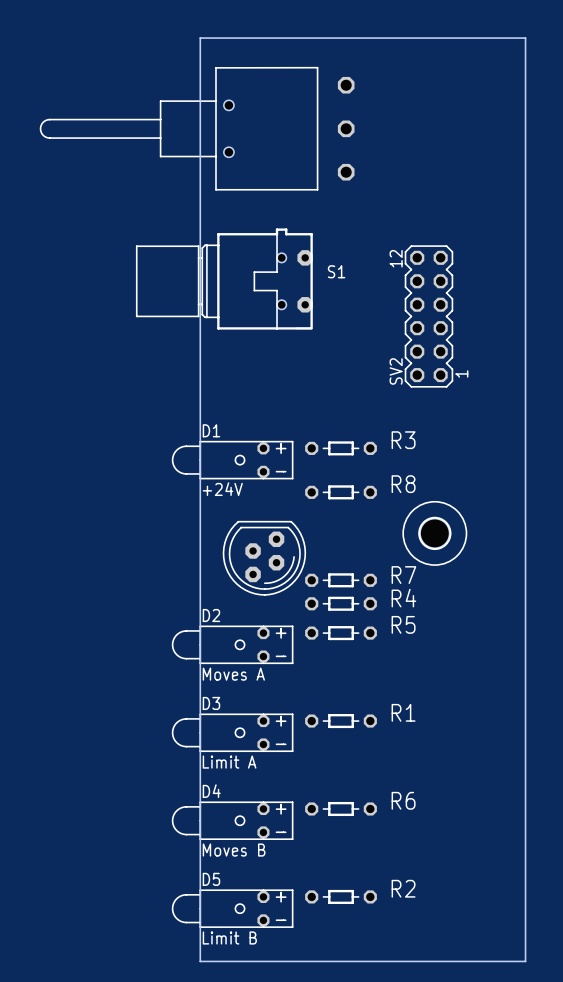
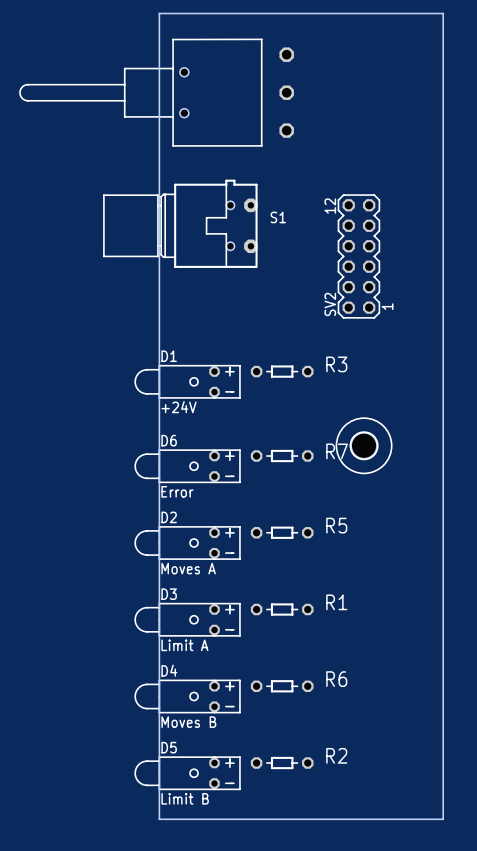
R8: (341, 492) -> none
D6: none -> Error (187, 466)
part: (264, 558) -> none
R7 position: (341, 580) -> (282, 456)
R4: (341, 603) -> none

